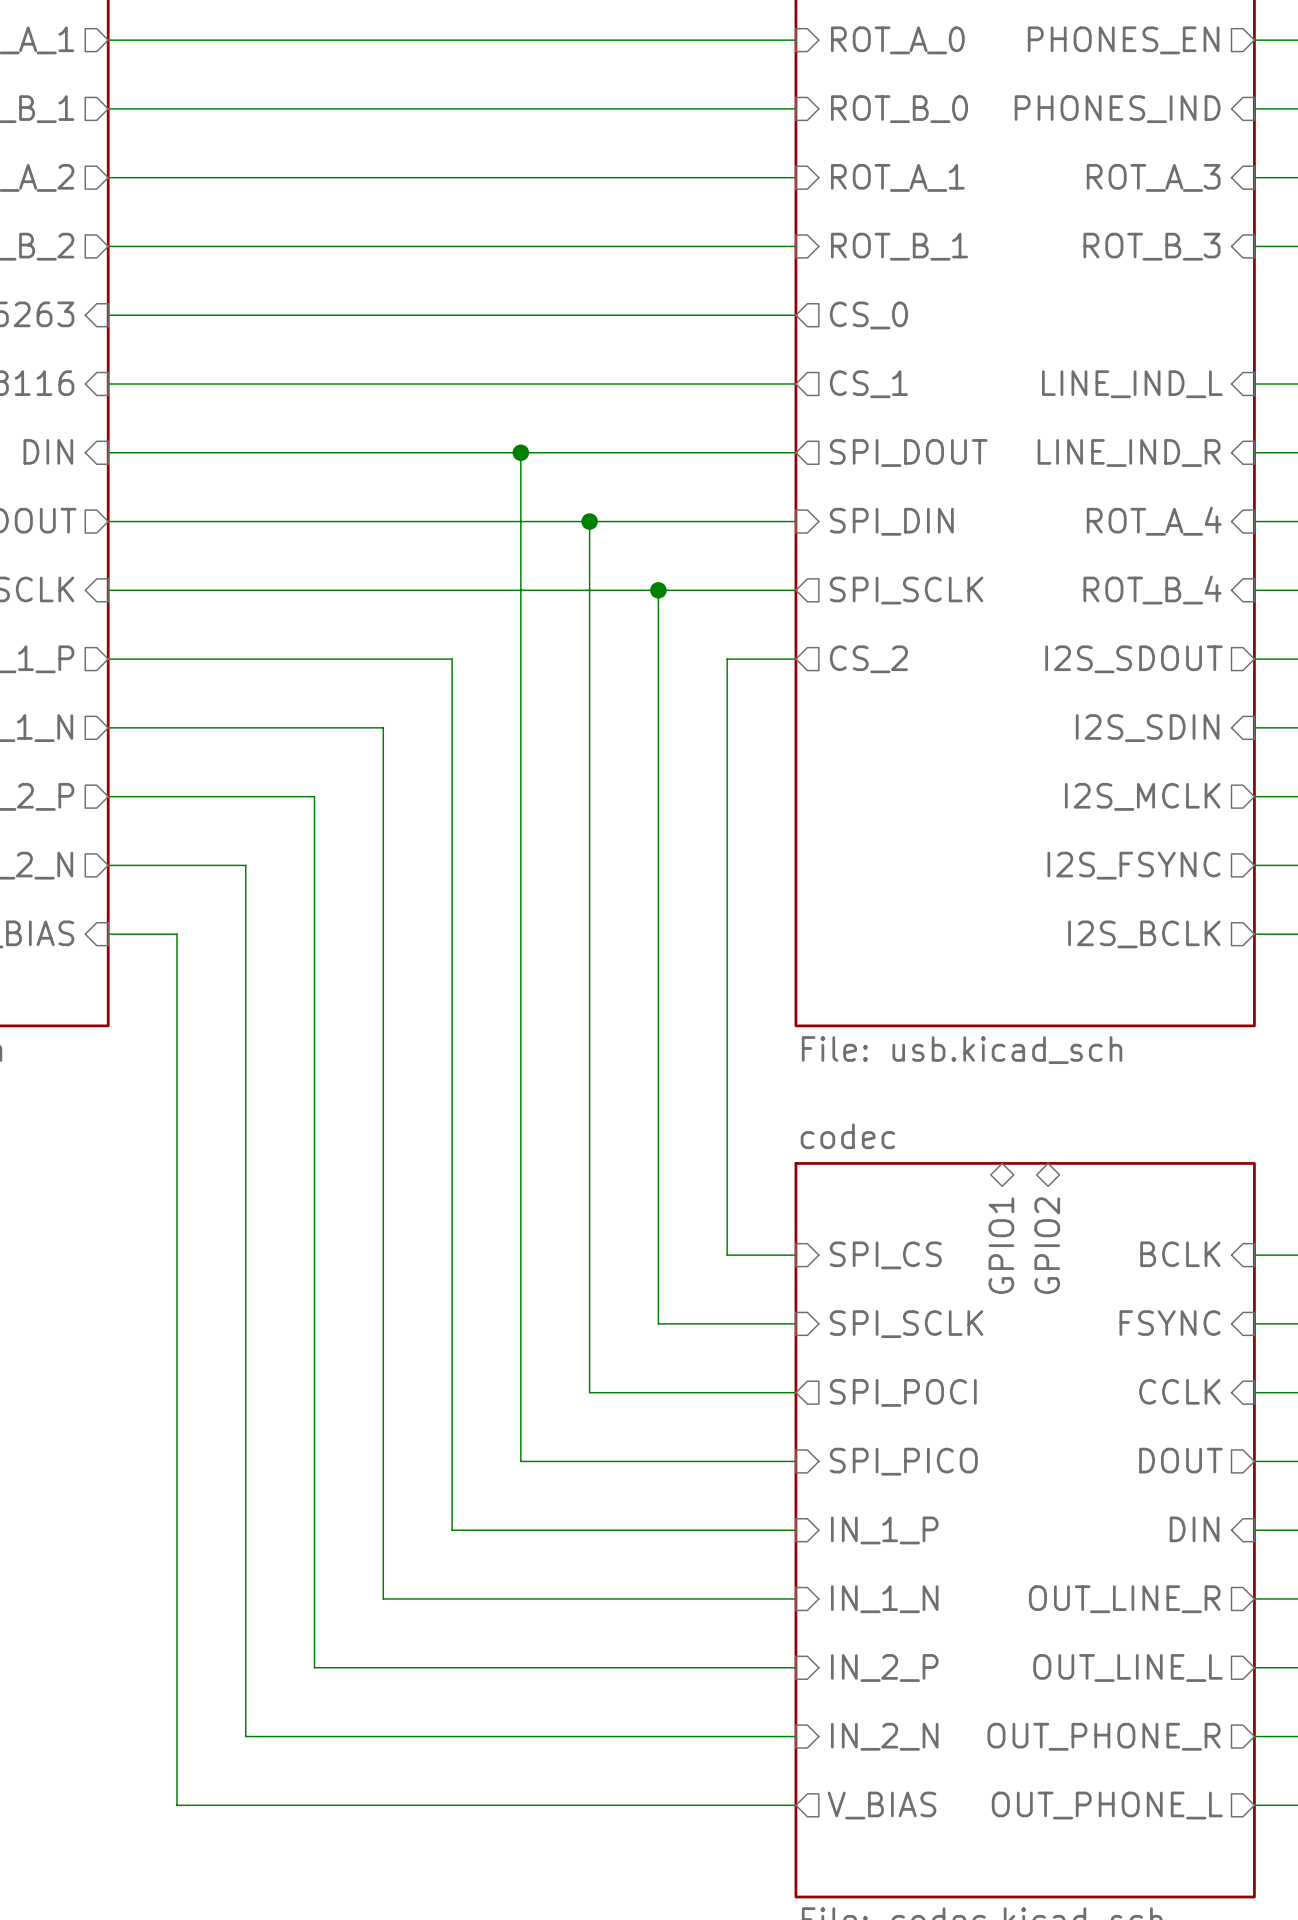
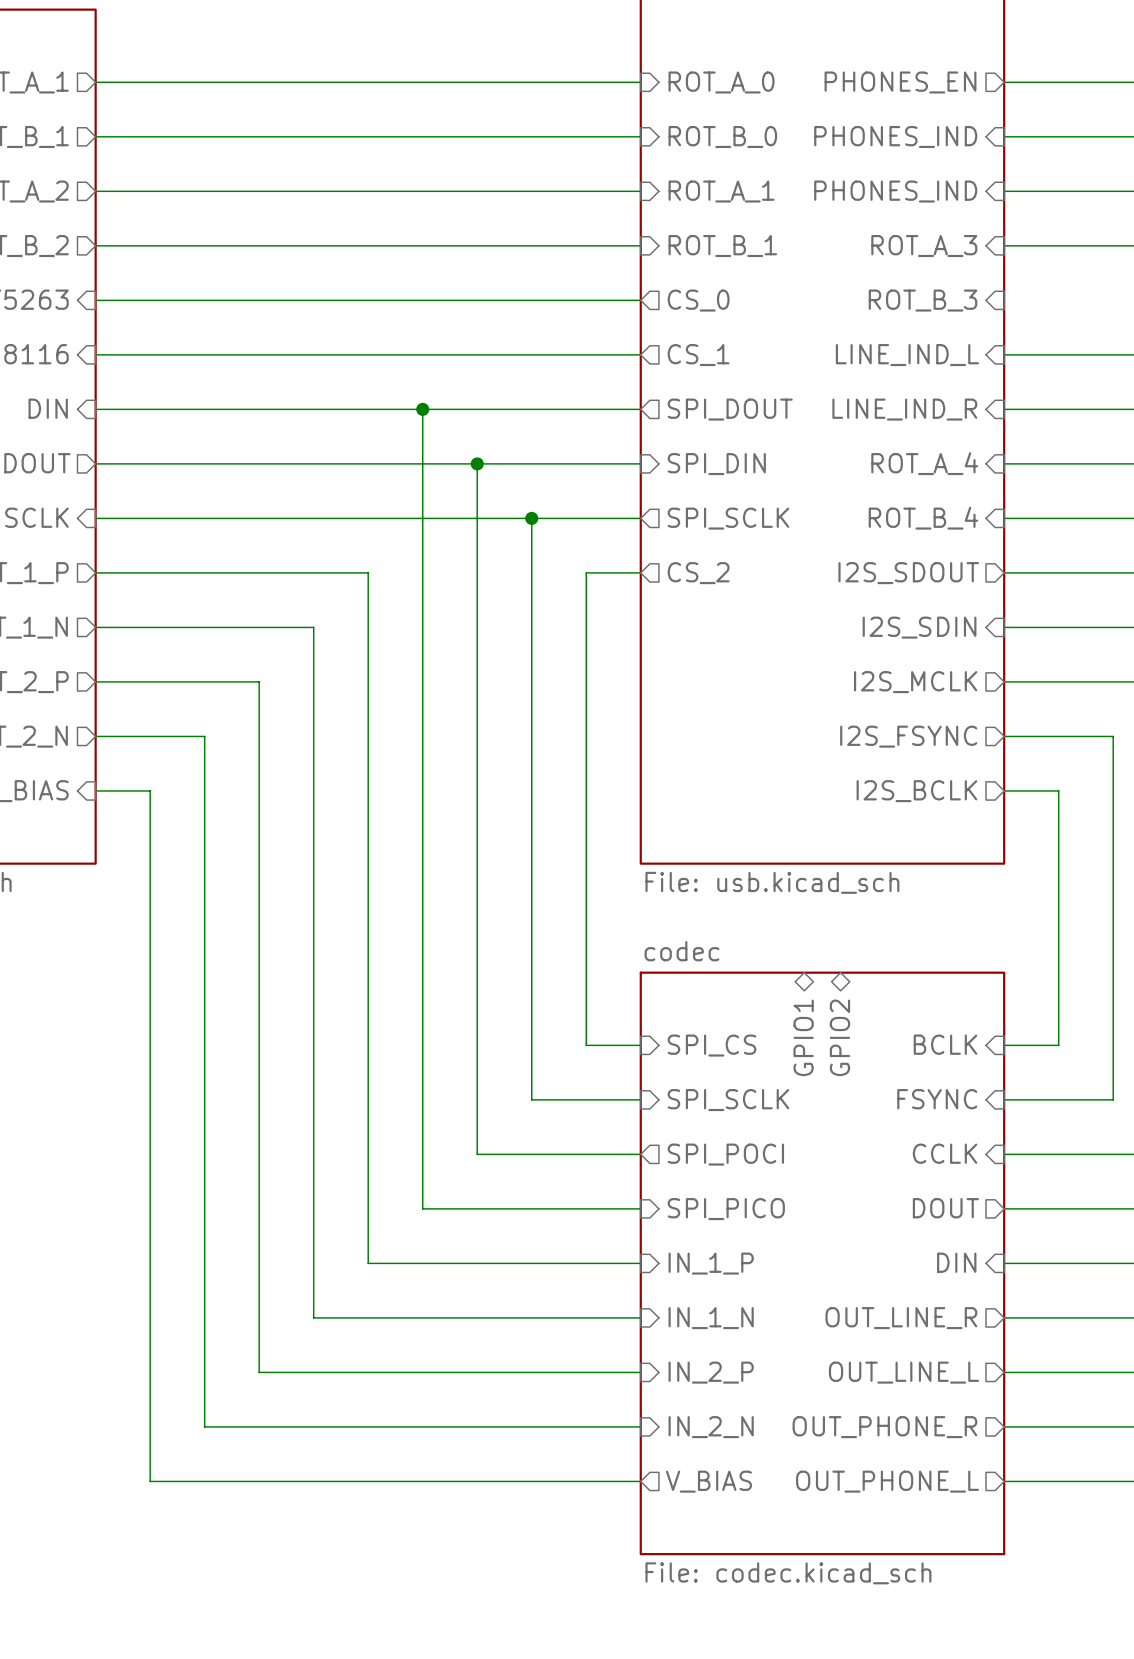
sheet pin: ROT_A_3 (1153, 177) -> PHONES_IND (895, 191)
sheet pin: ROT_B_3 (1152, 246) -> ROT_A_3 (924, 246)
sheet pin: none -> ROT_B_3 (923, 300)

